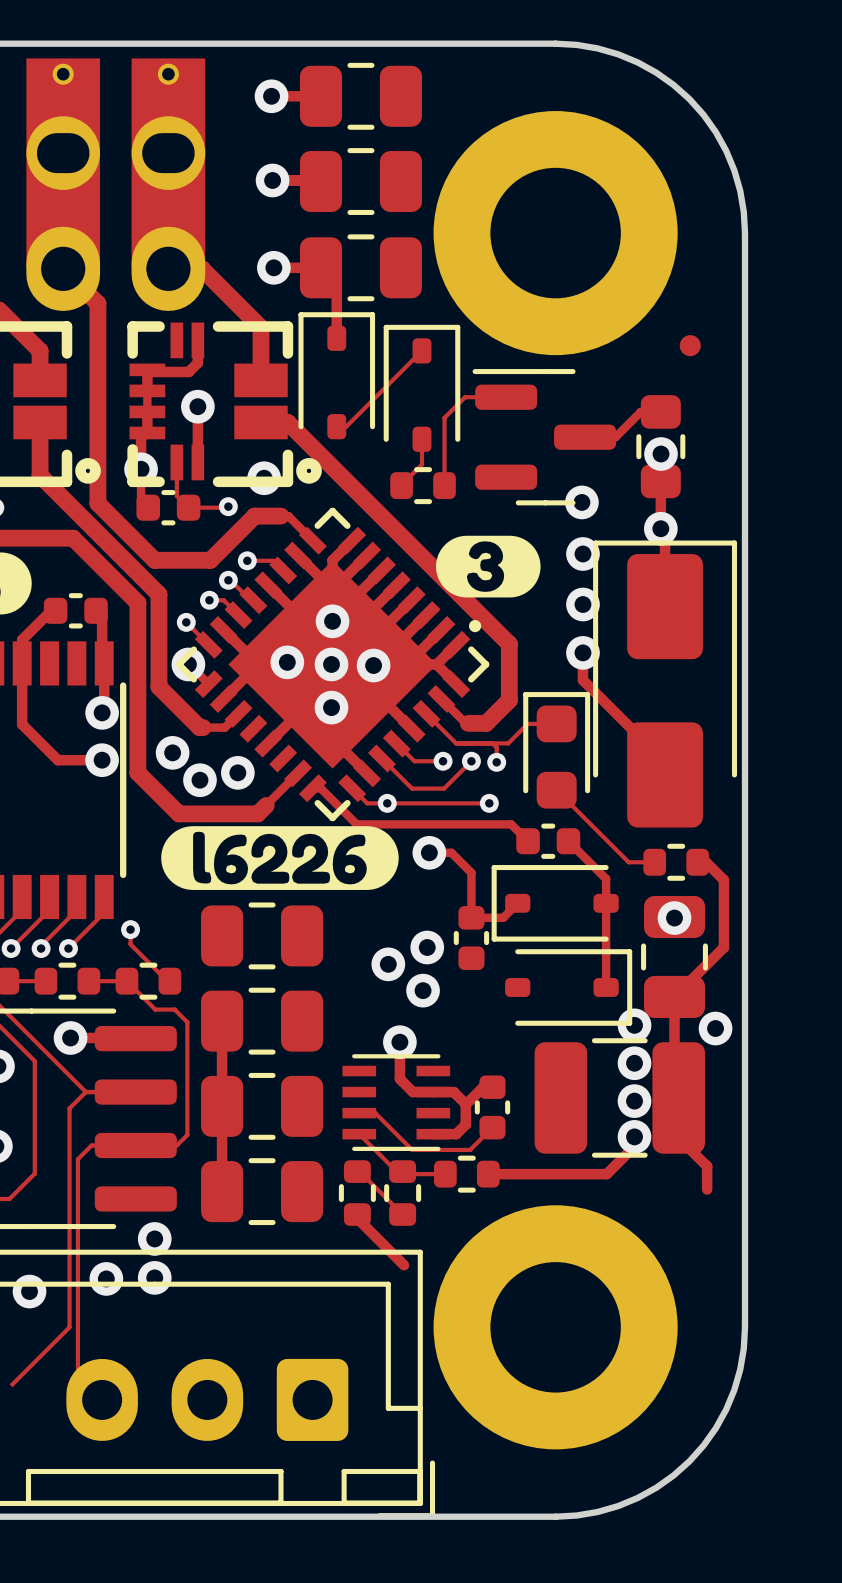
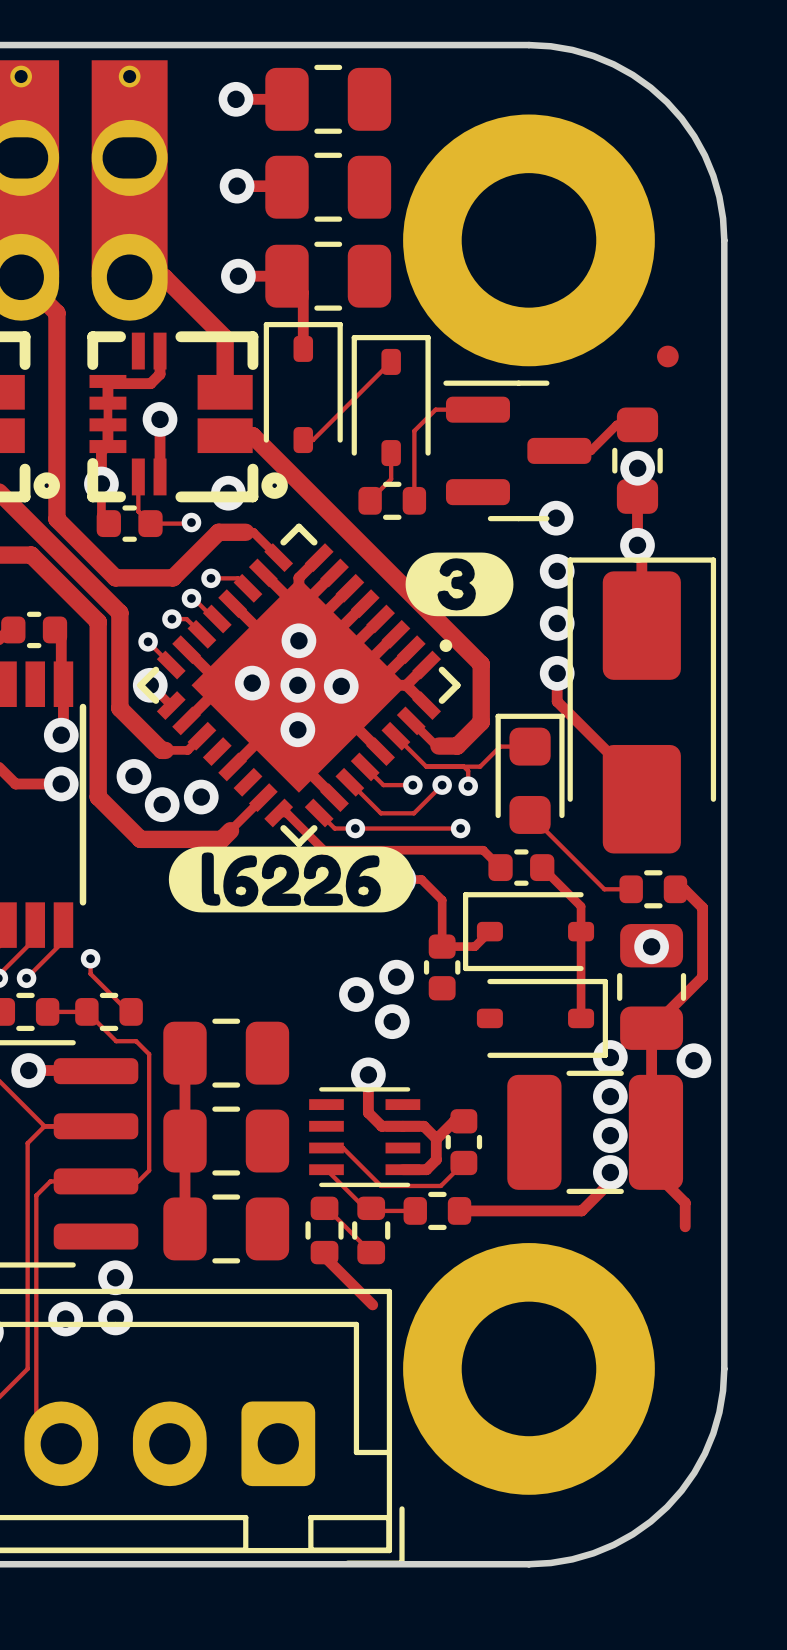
drawing position: (279, 858) -> (291, 879)
part: (262, 935) -> none

